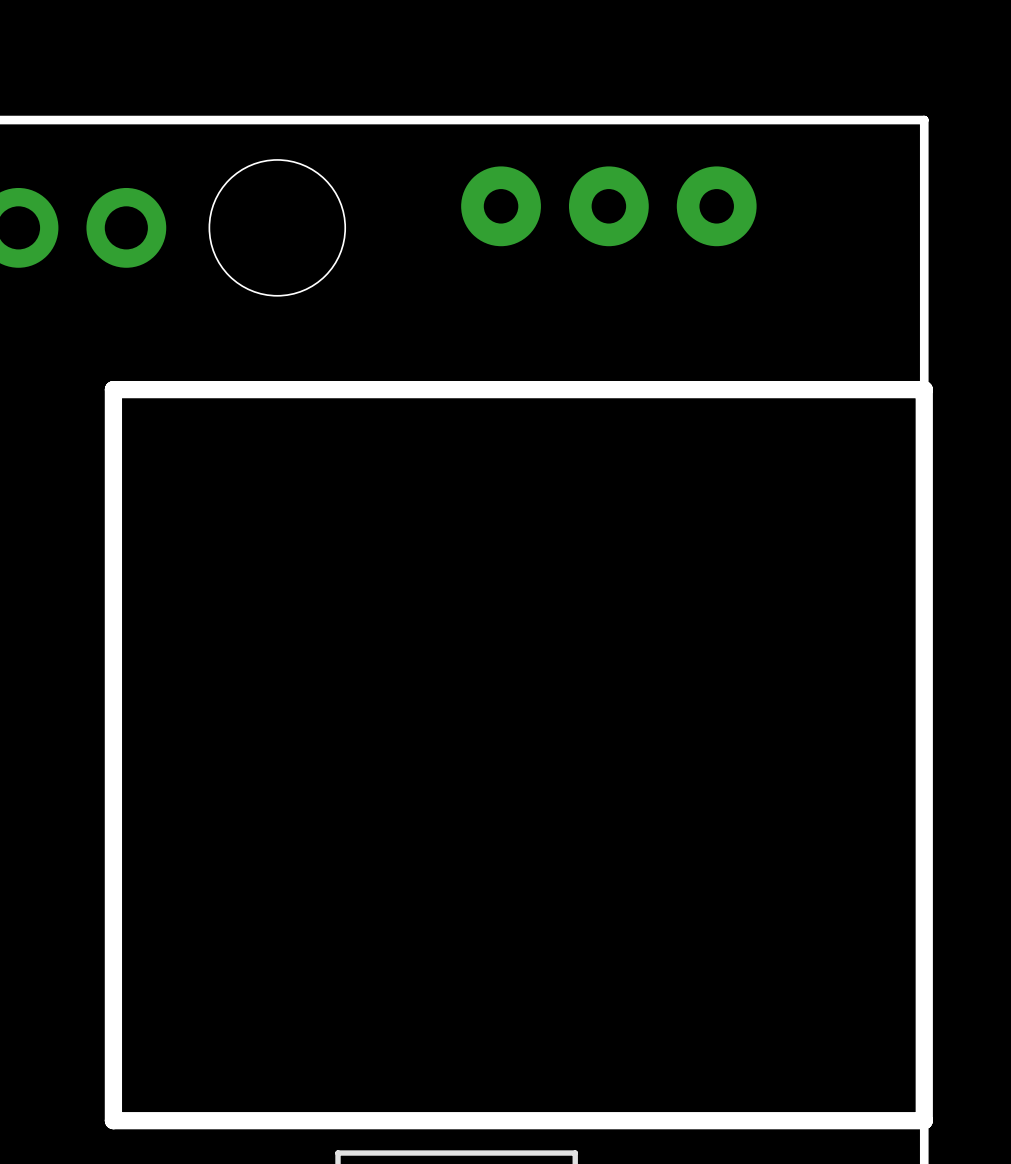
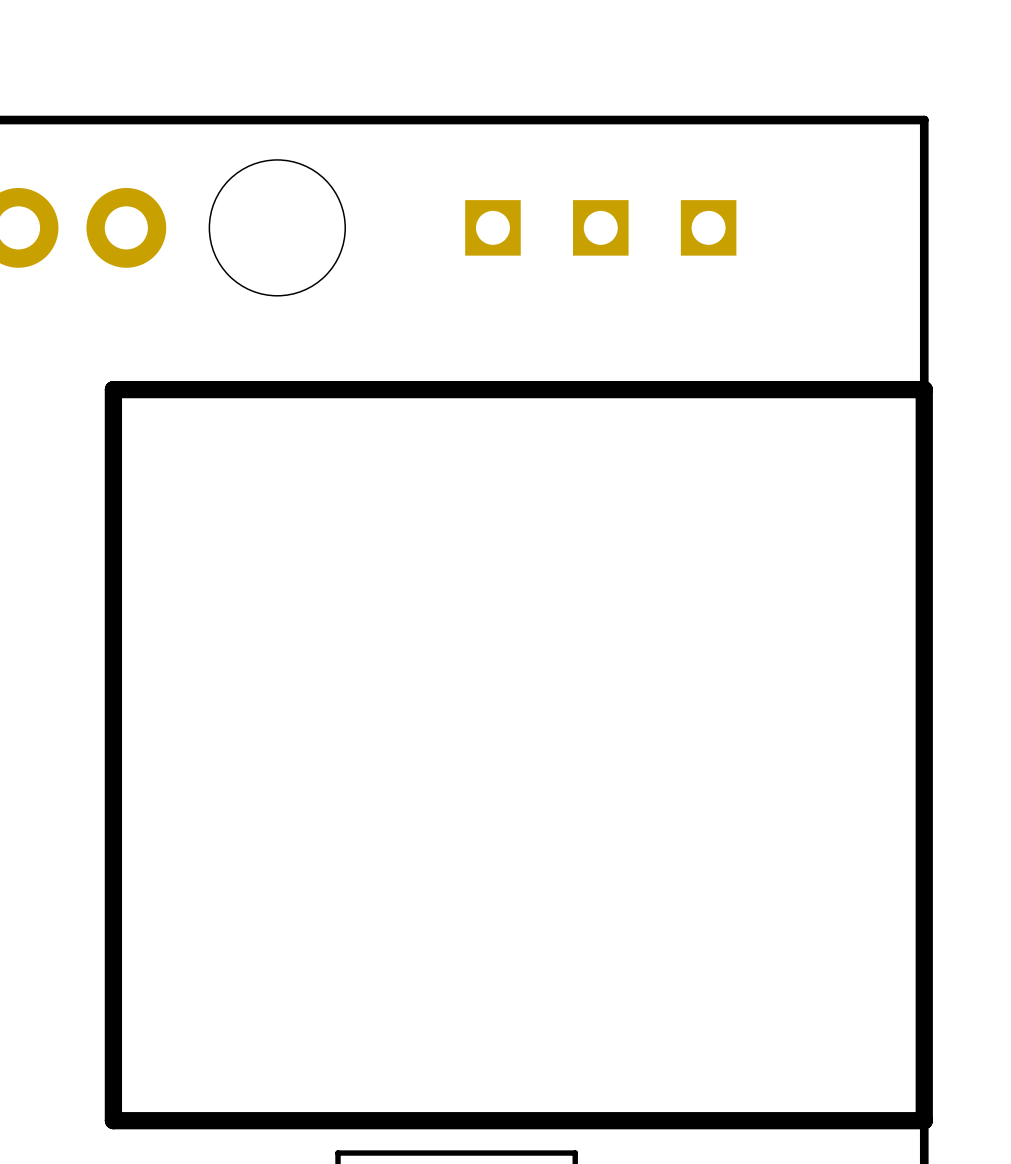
part footprint: [461, 166, 757, 247] -> [465, 200, 737, 256]

